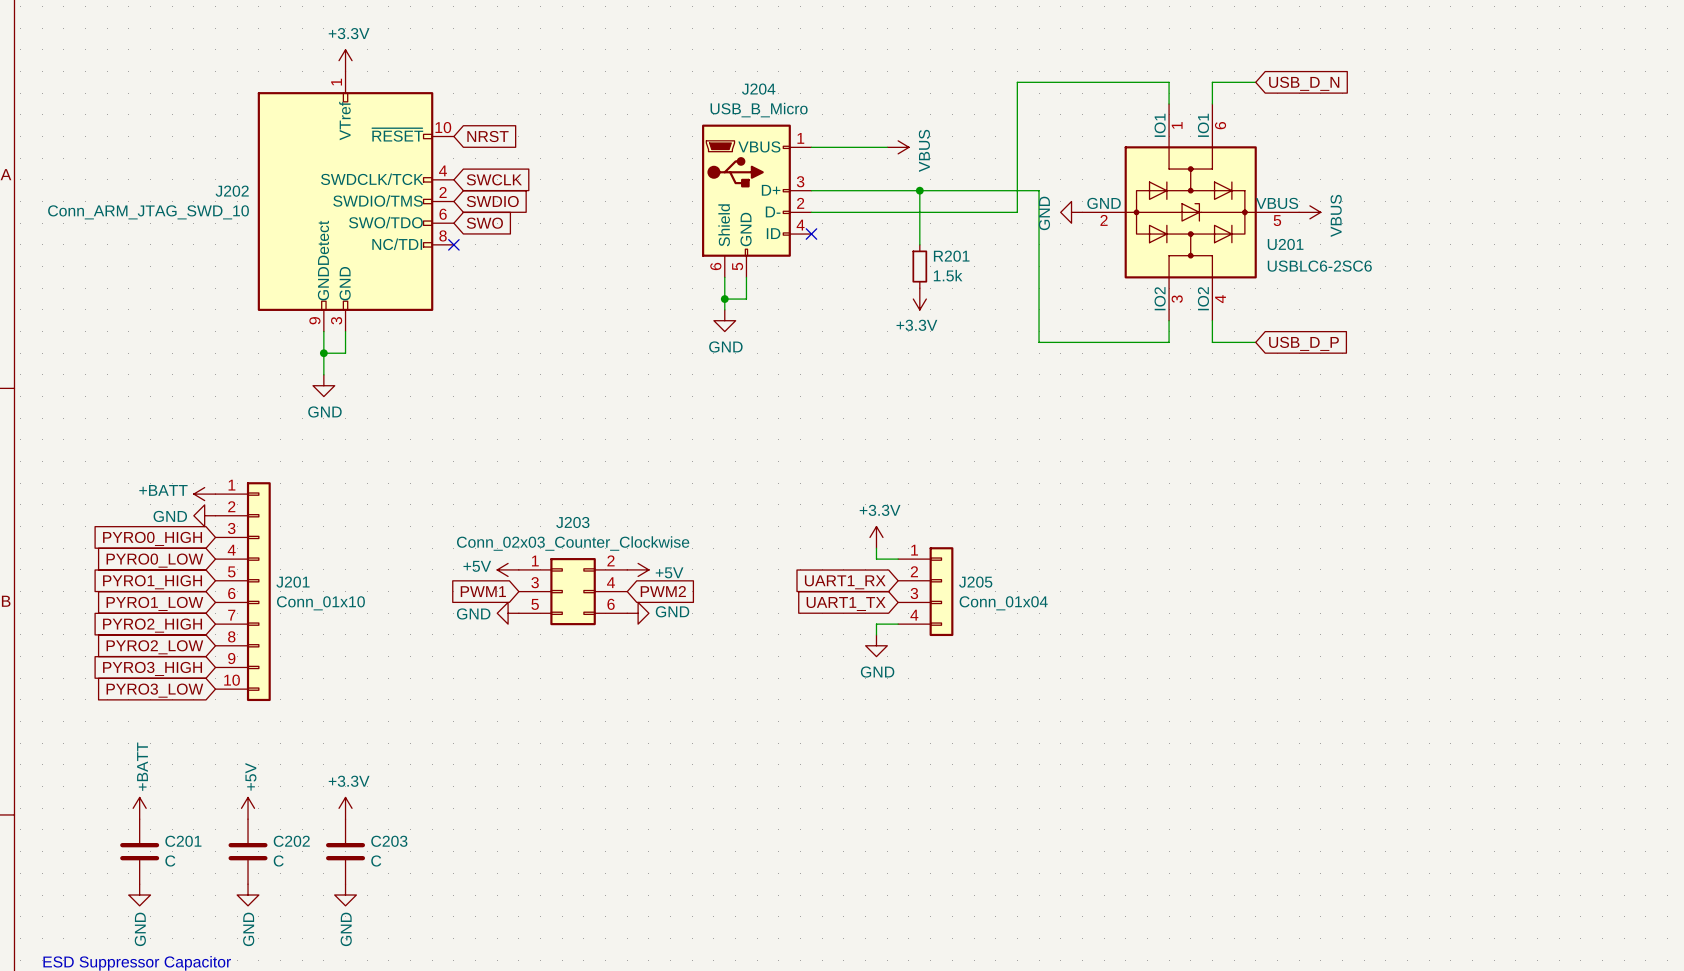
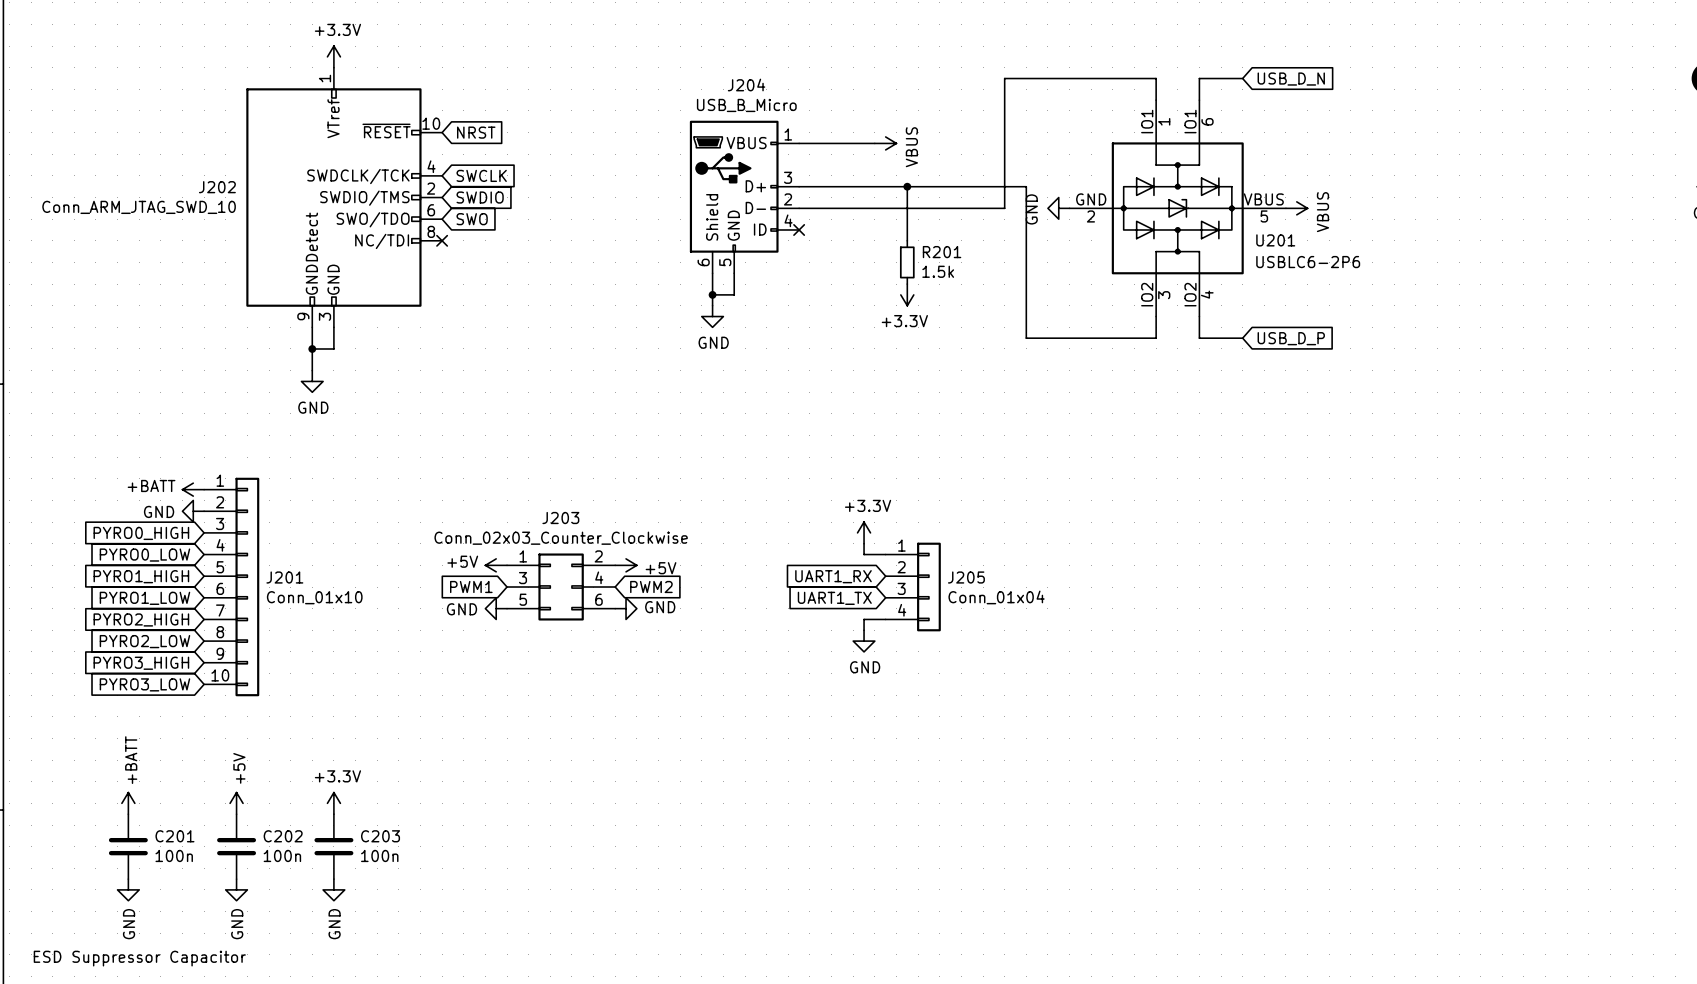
U201 value: USBLC6-2SC6 (1319, 266) -> USBLC6-2P6 (1308, 262)
C201 value: C (170, 861) -> 100n (174, 855)
C202 value: C (278, 861) -> 100n (282, 855)
C203 value: C (376, 861) -> 100n (379, 855)

